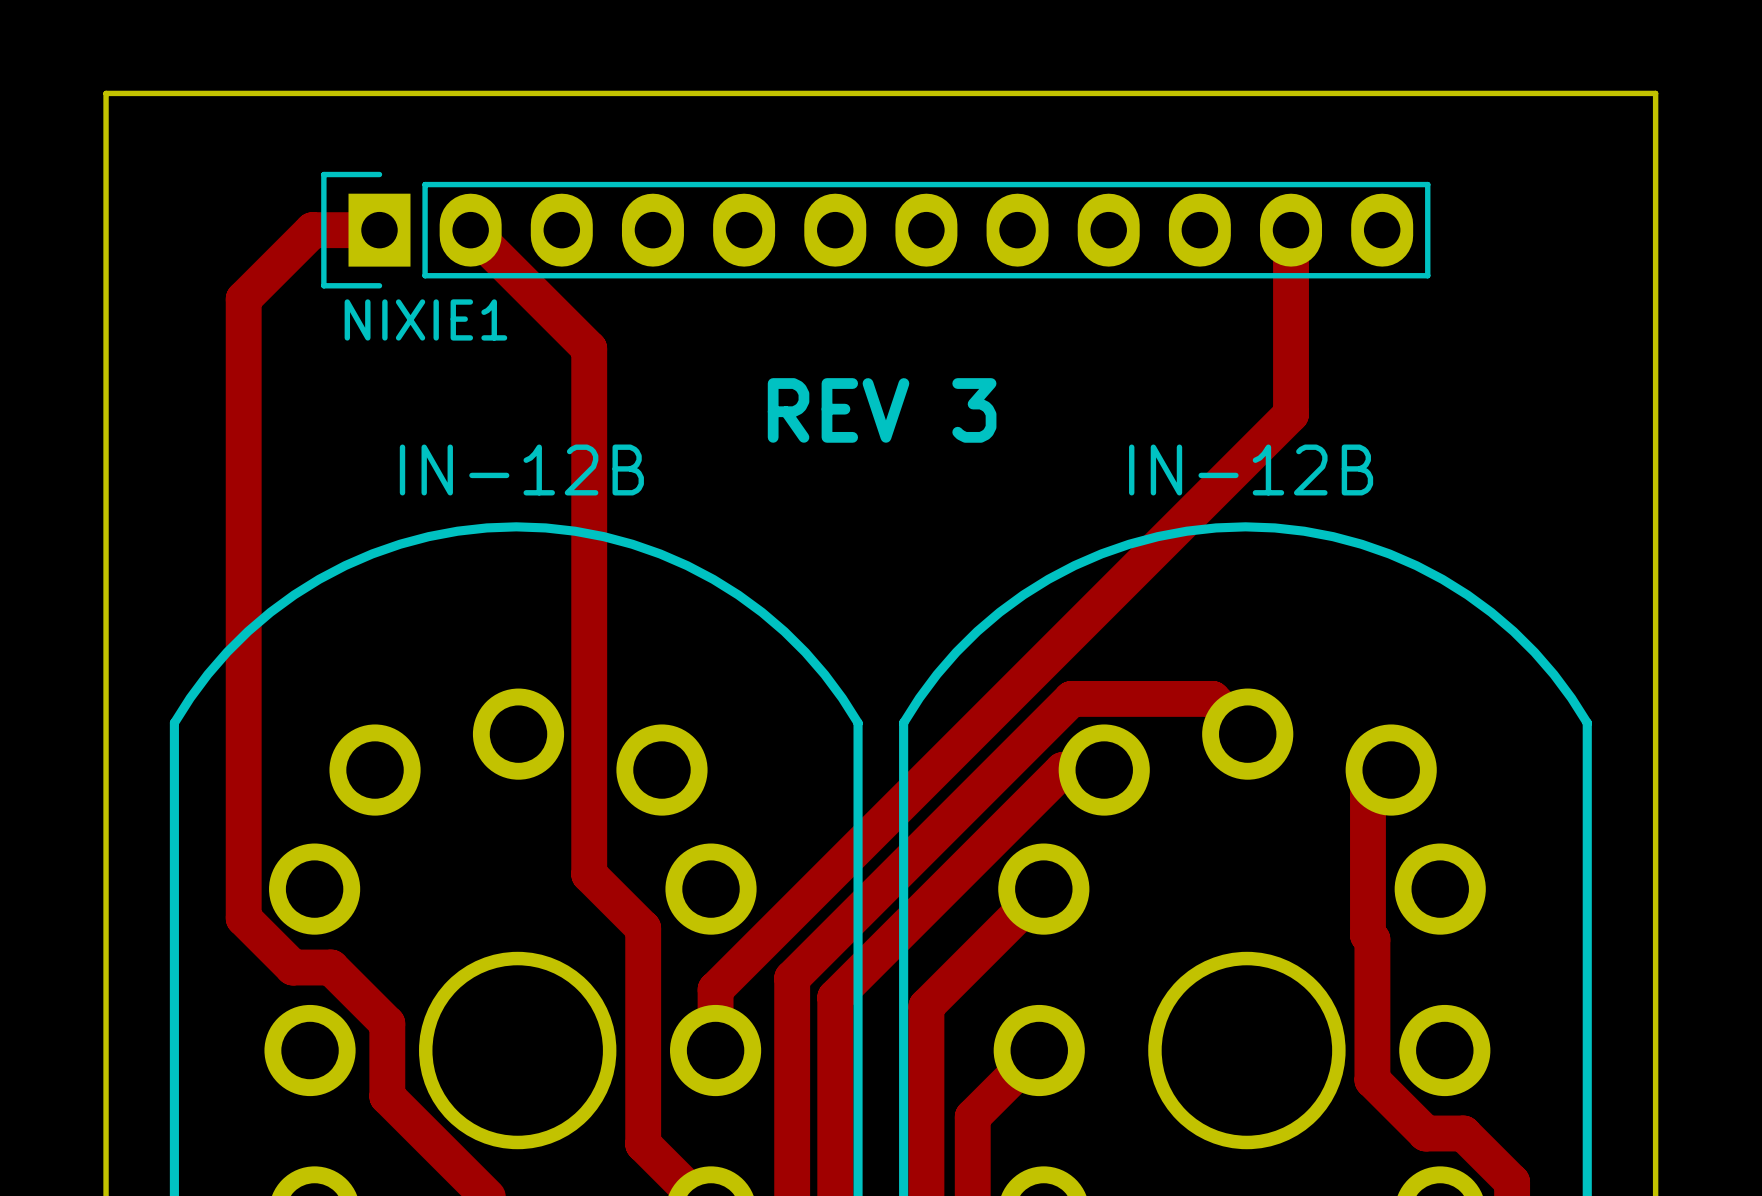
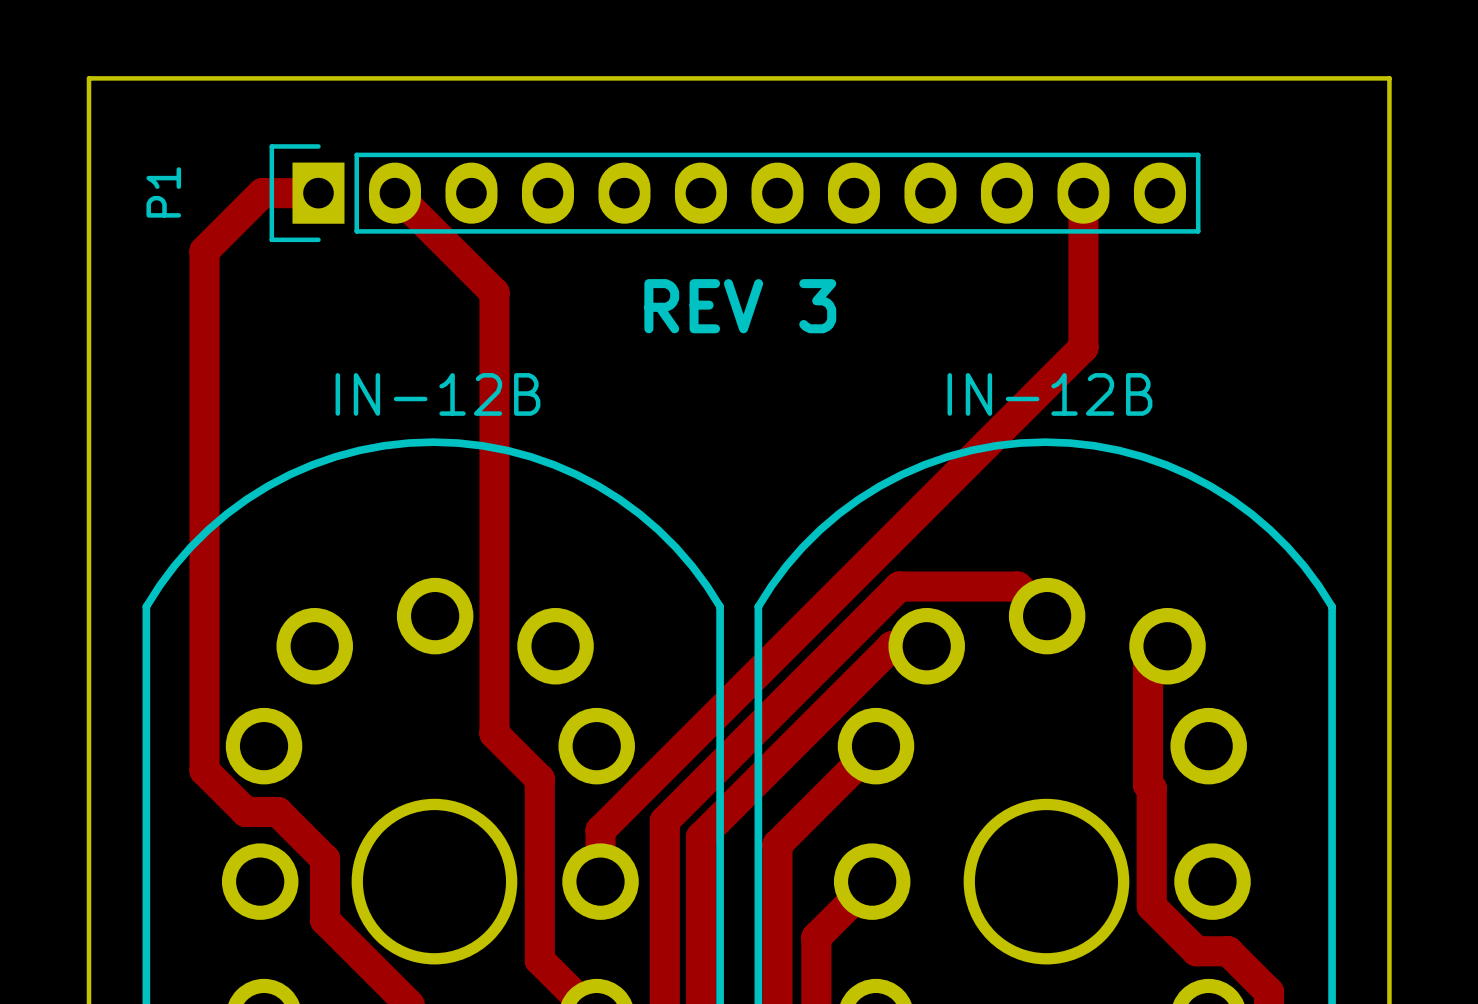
P1 name: none -> P1 (163, 192)
text: NIXIE1 (425, 319) -> none
text position: REV 3 (882, 410) -> REV 3 (740, 306)

